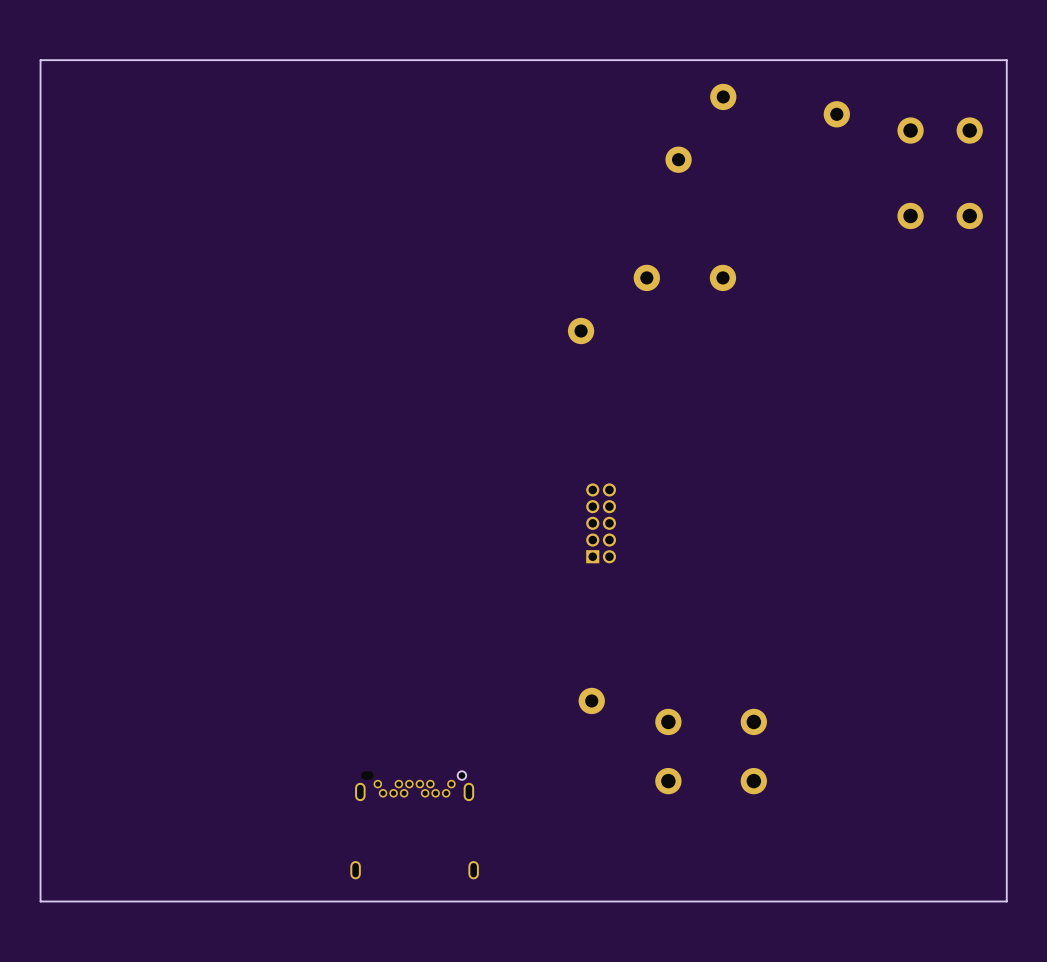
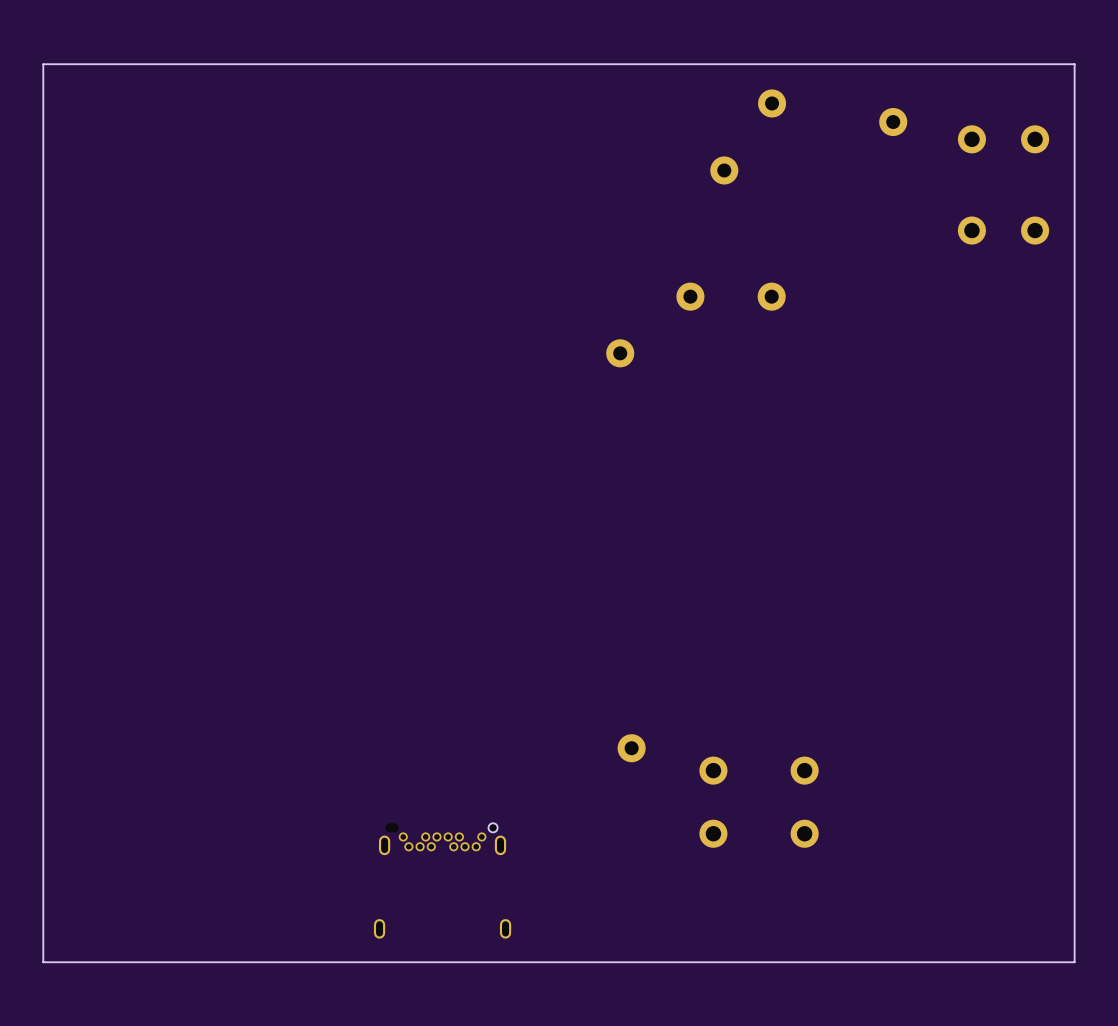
part: (601, 523) -> none

